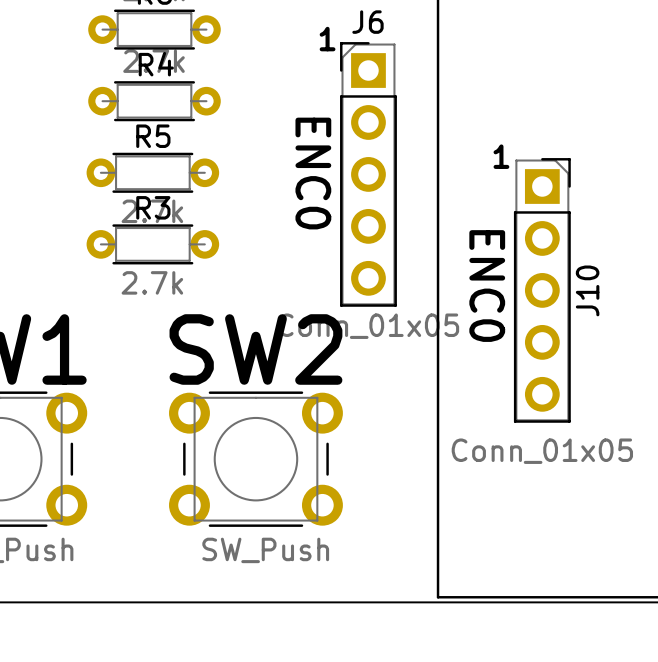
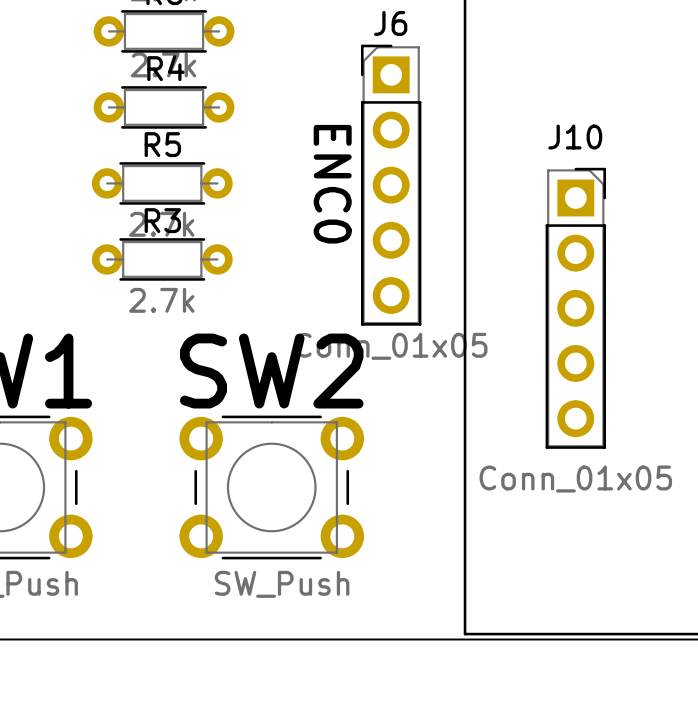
text: 1 (327, 39) -> none
text: 1 (501, 156) -> none
text: ENC0 (487, 286) -> none
J10 name rotation: 0° (587, 290) -> 90° clockwise (575, 137)
J10 name position: J10 (587, 290) -> J10 (575, 137)

